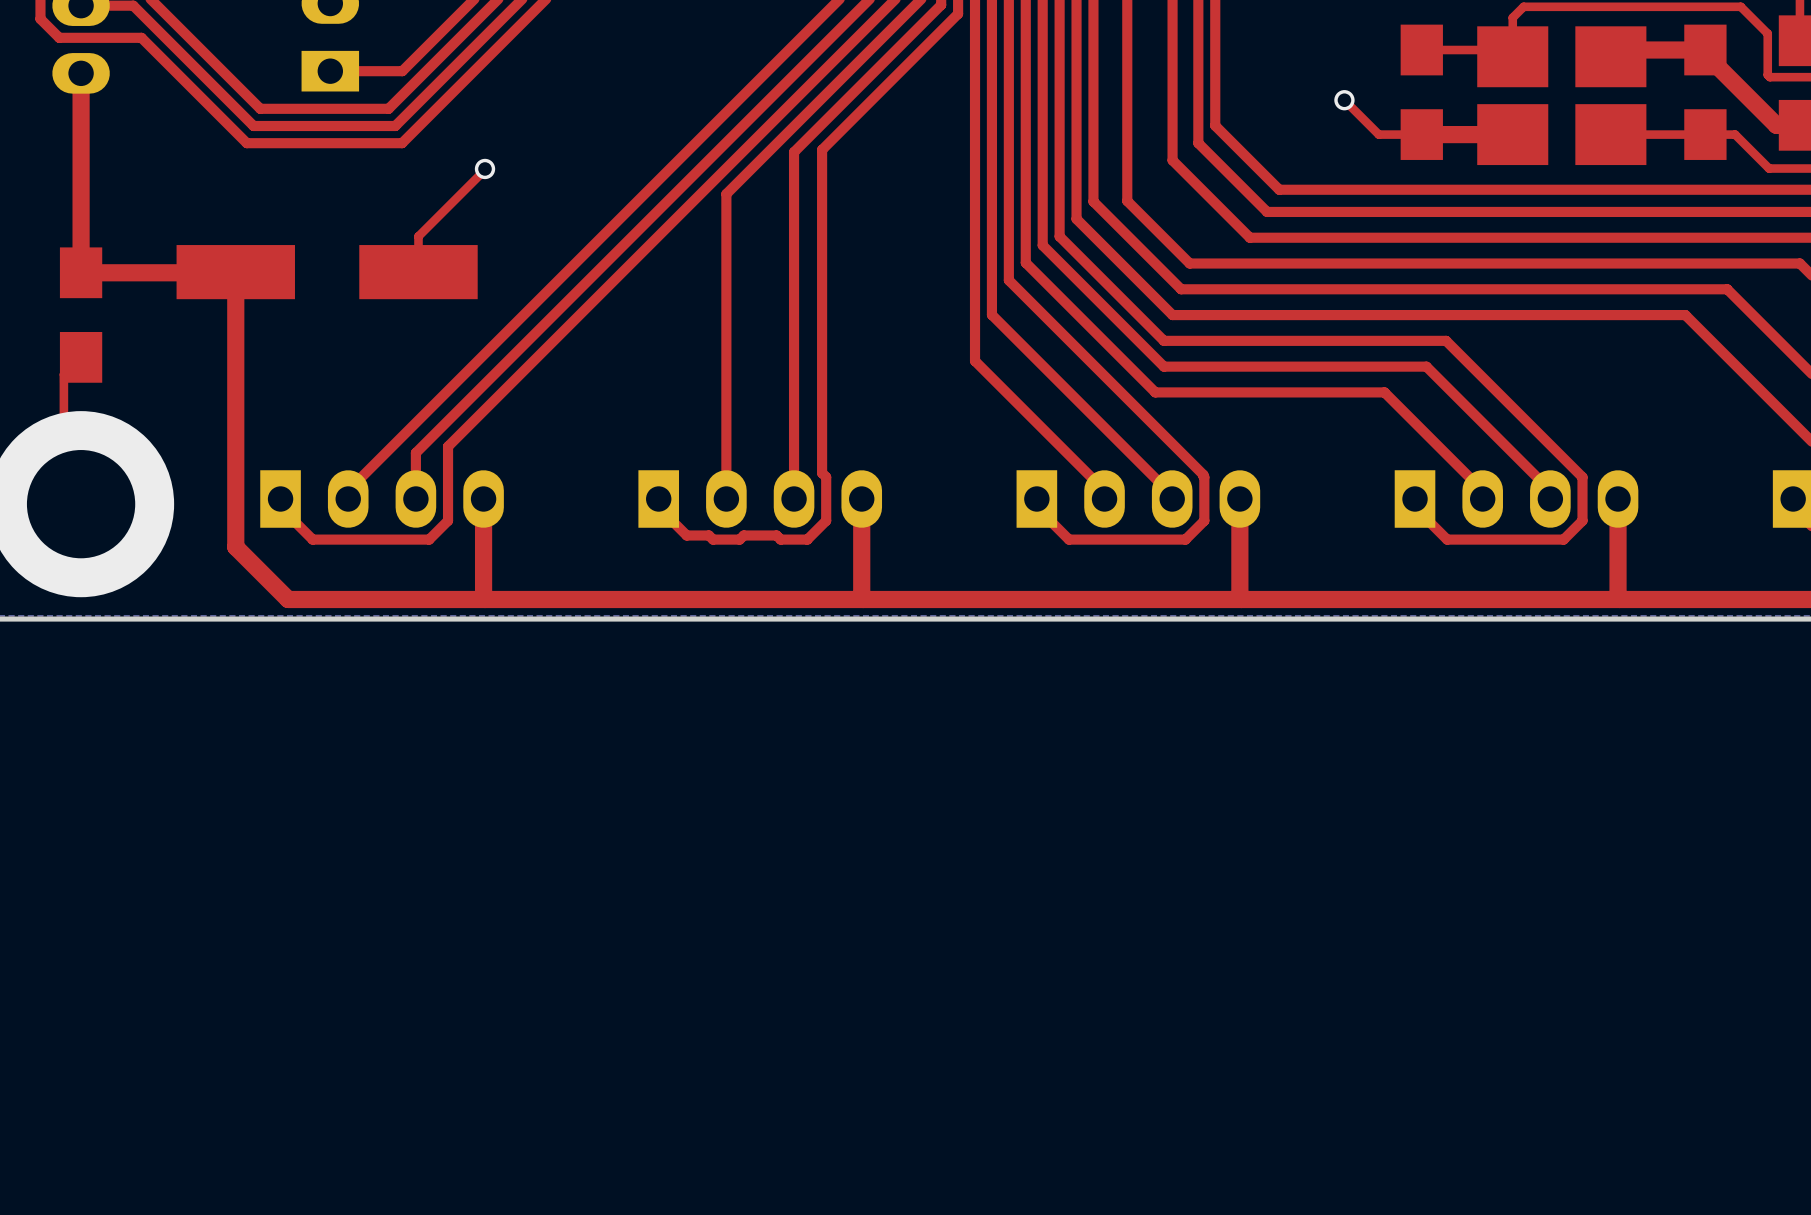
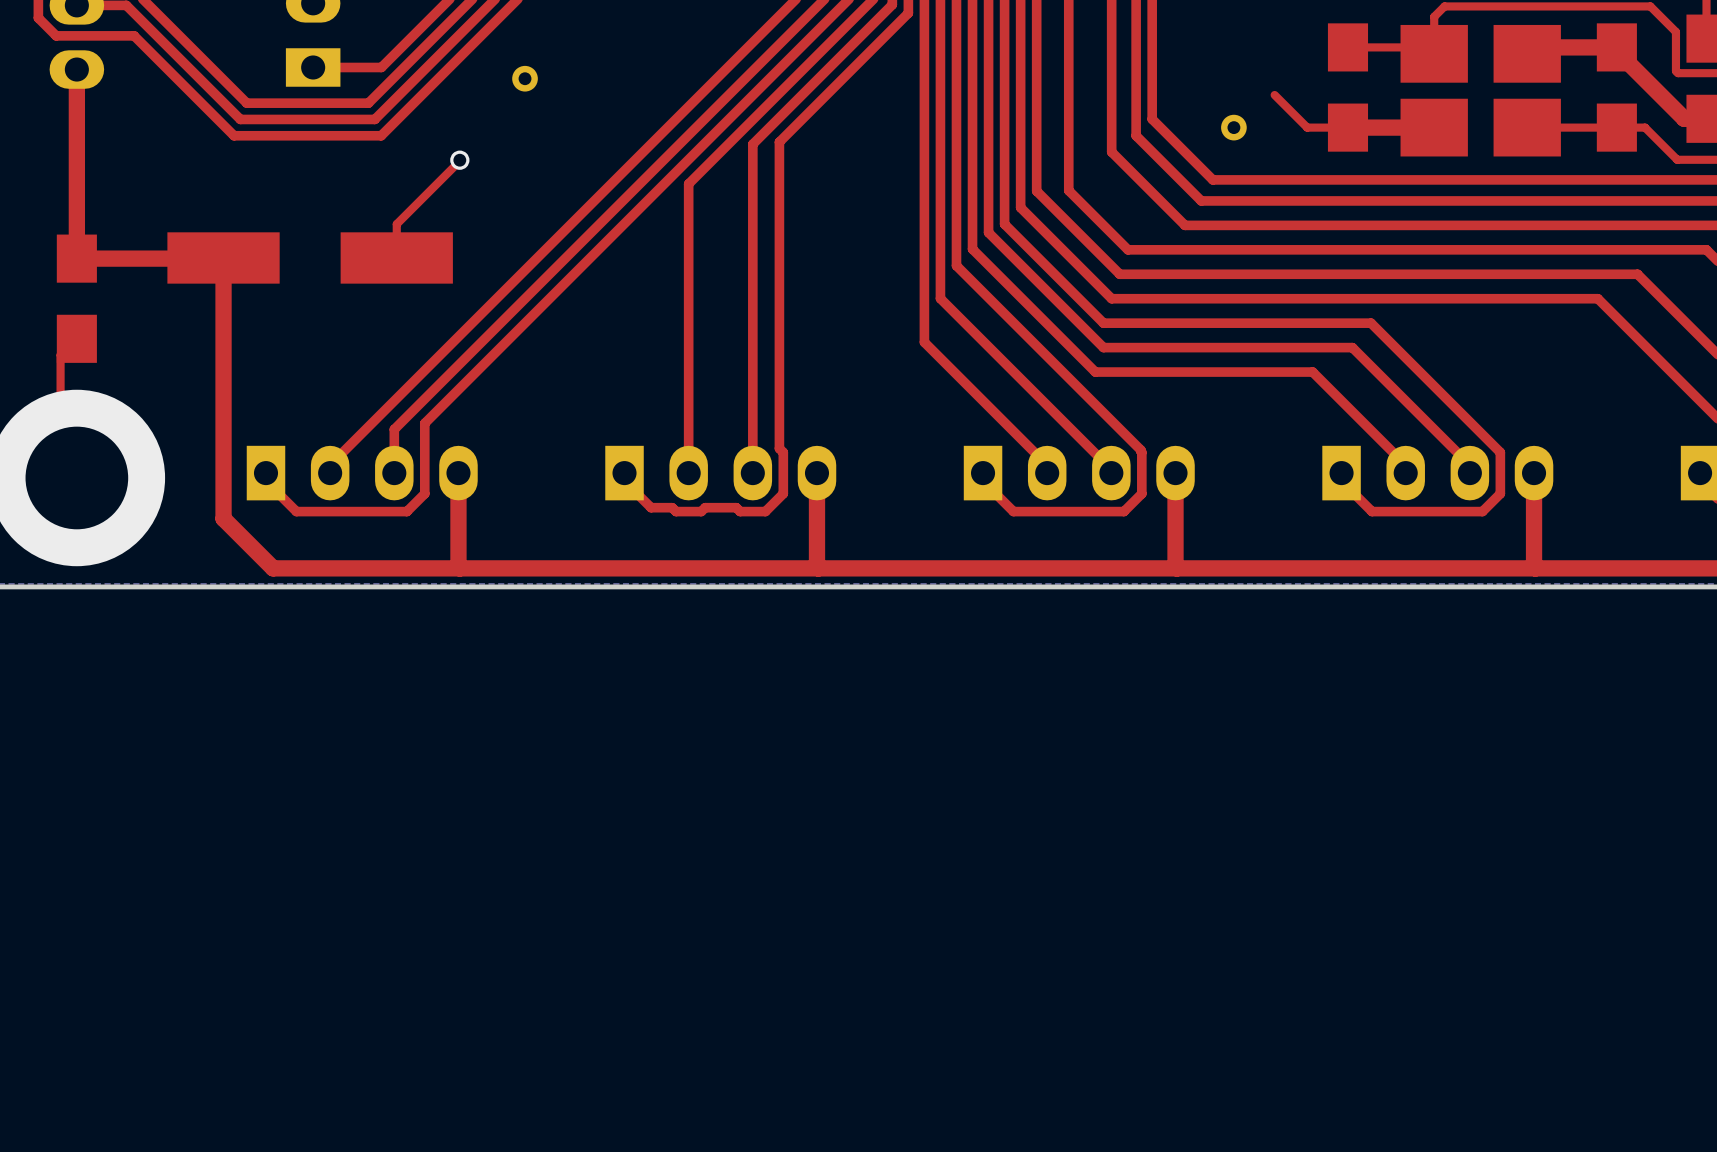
part: none -> (525, 78)
via: (1344, 100) -> none
part: none -> (1233, 127)

